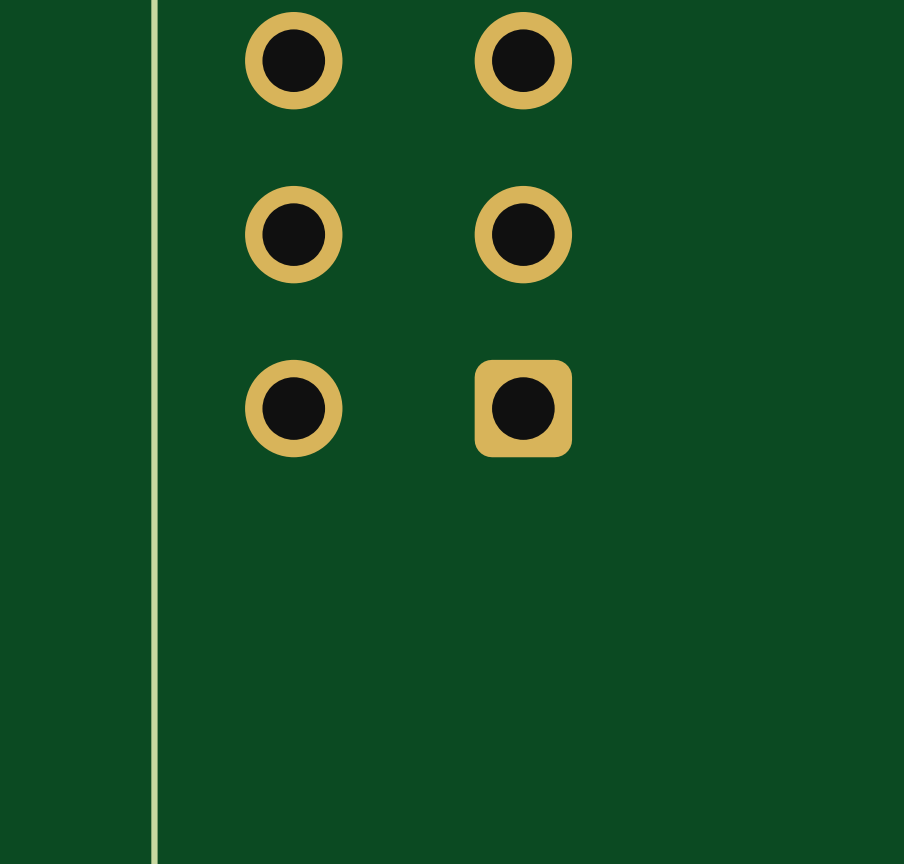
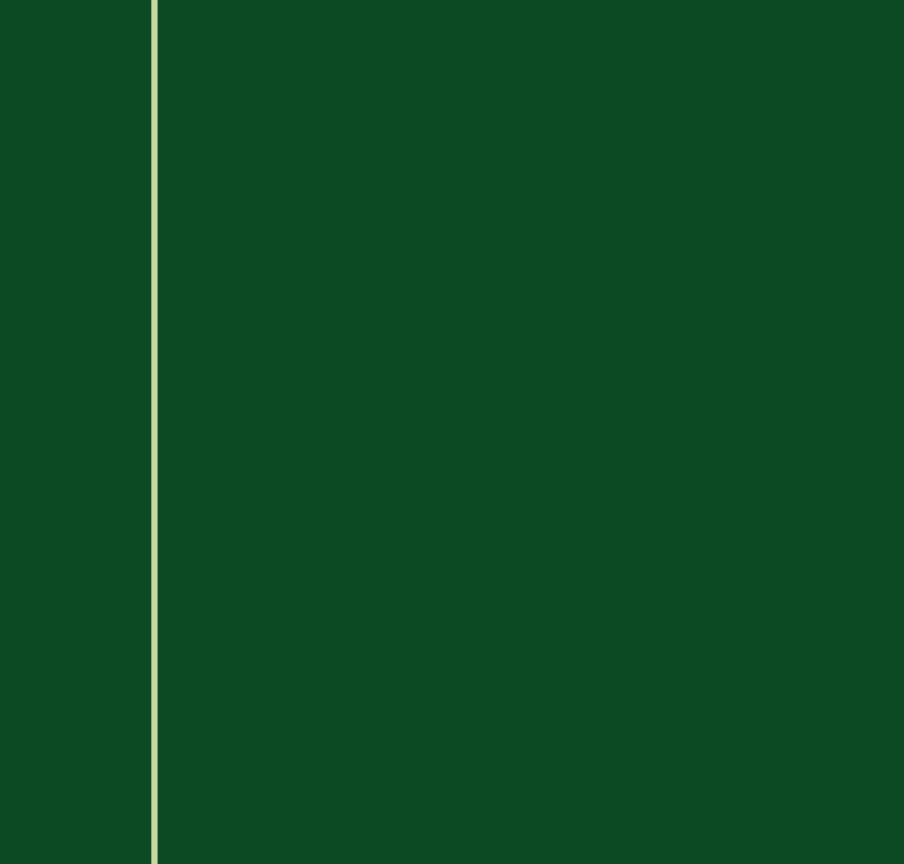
part: (408, 234) -> none

